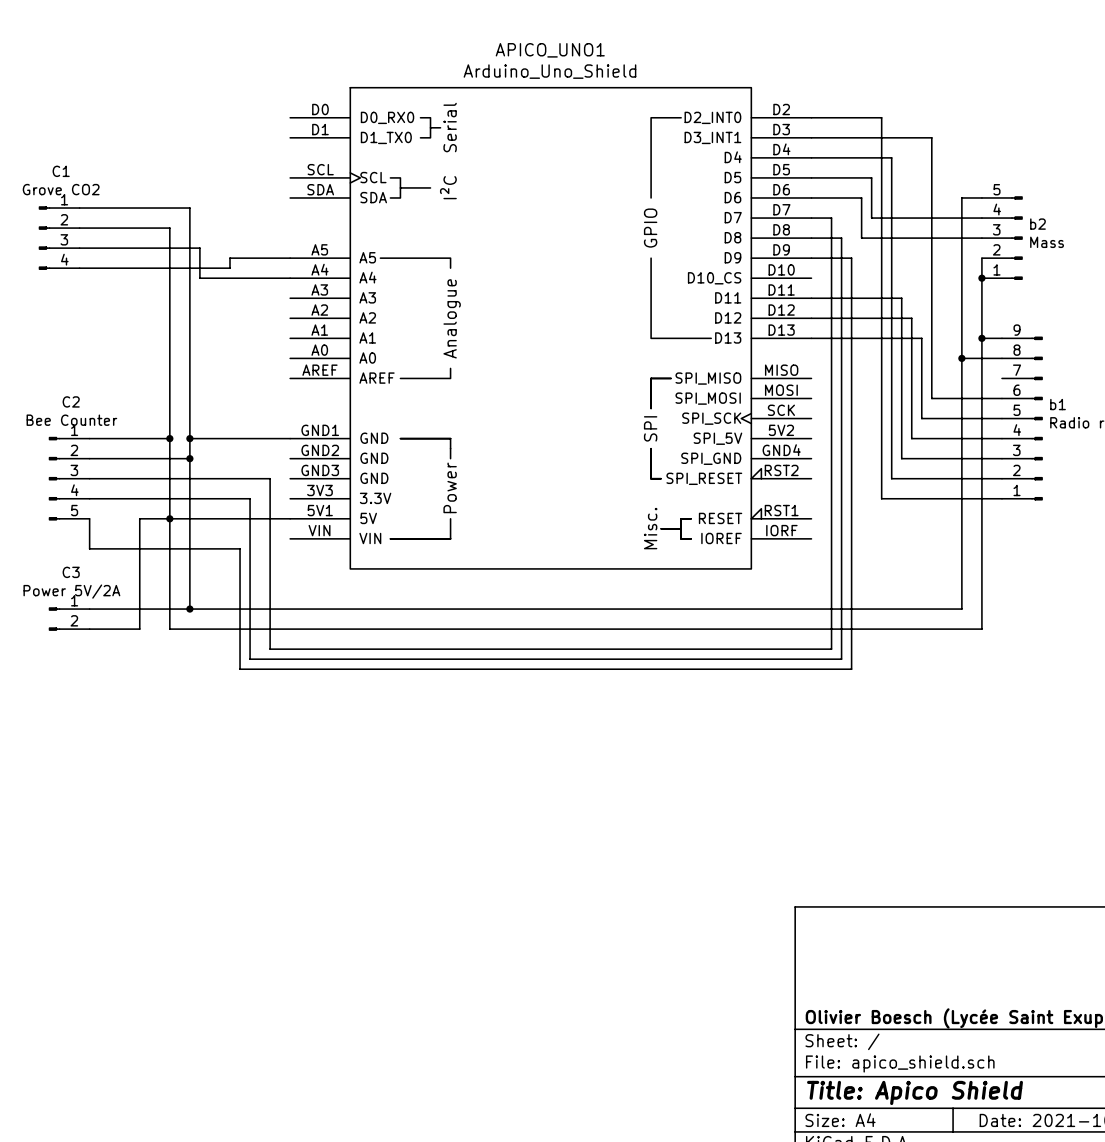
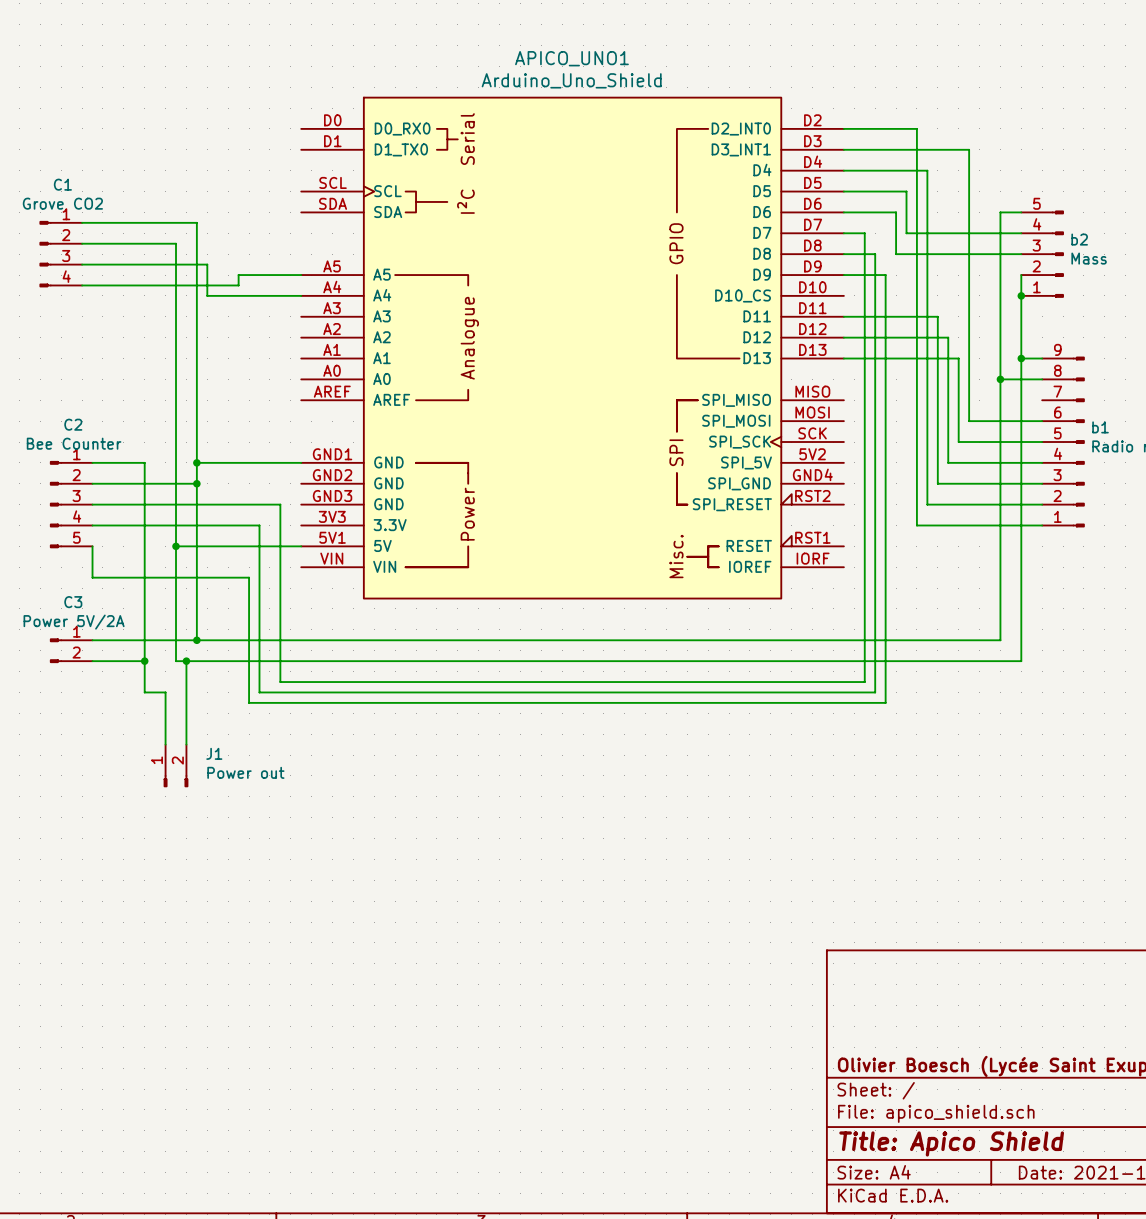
wire: (139, 438) (169, 438) -> (144, 462) (144, 546)
junction: (169, 438) -> none
wire: (139, 518) (169, 518) -> none
wire: none -> (144, 661) (144, 692) (165, 692) (165, 744)
junction: none -> (144, 661)
wire: none -> (186, 661) (186, 744)
junction: none -> (186, 661)
J1: none -> Power out (176, 765)

